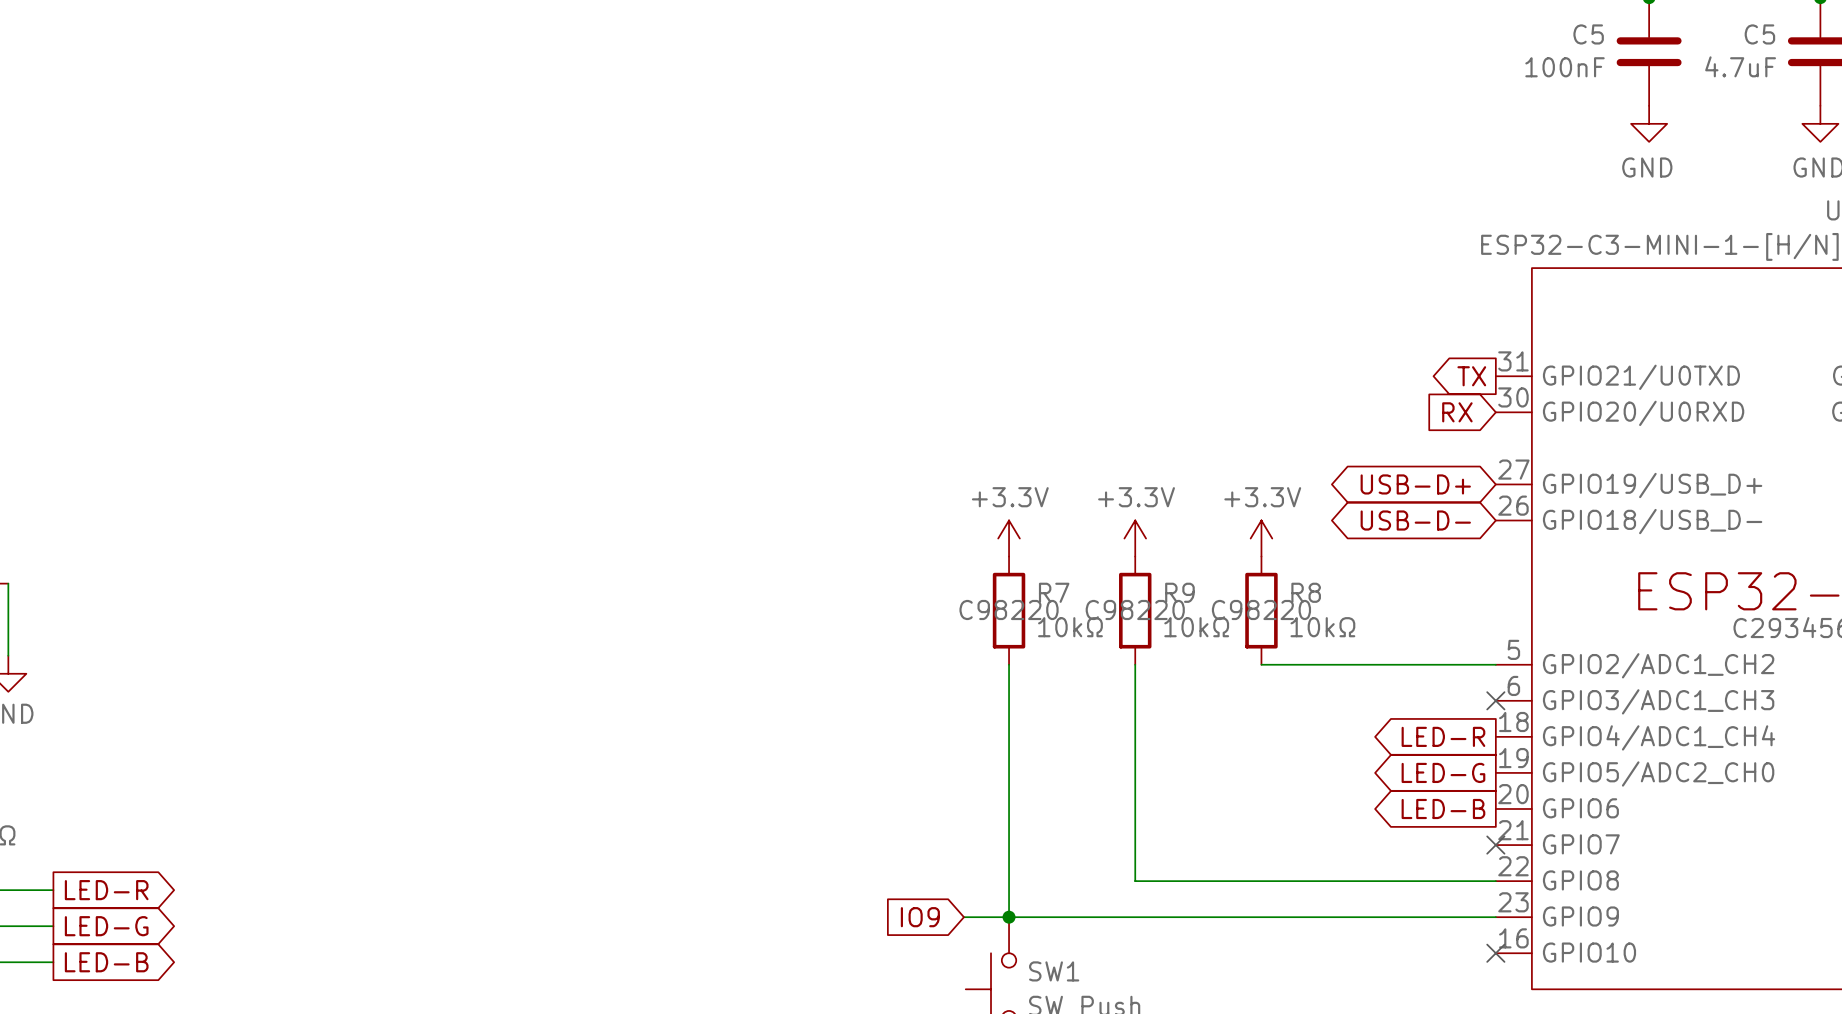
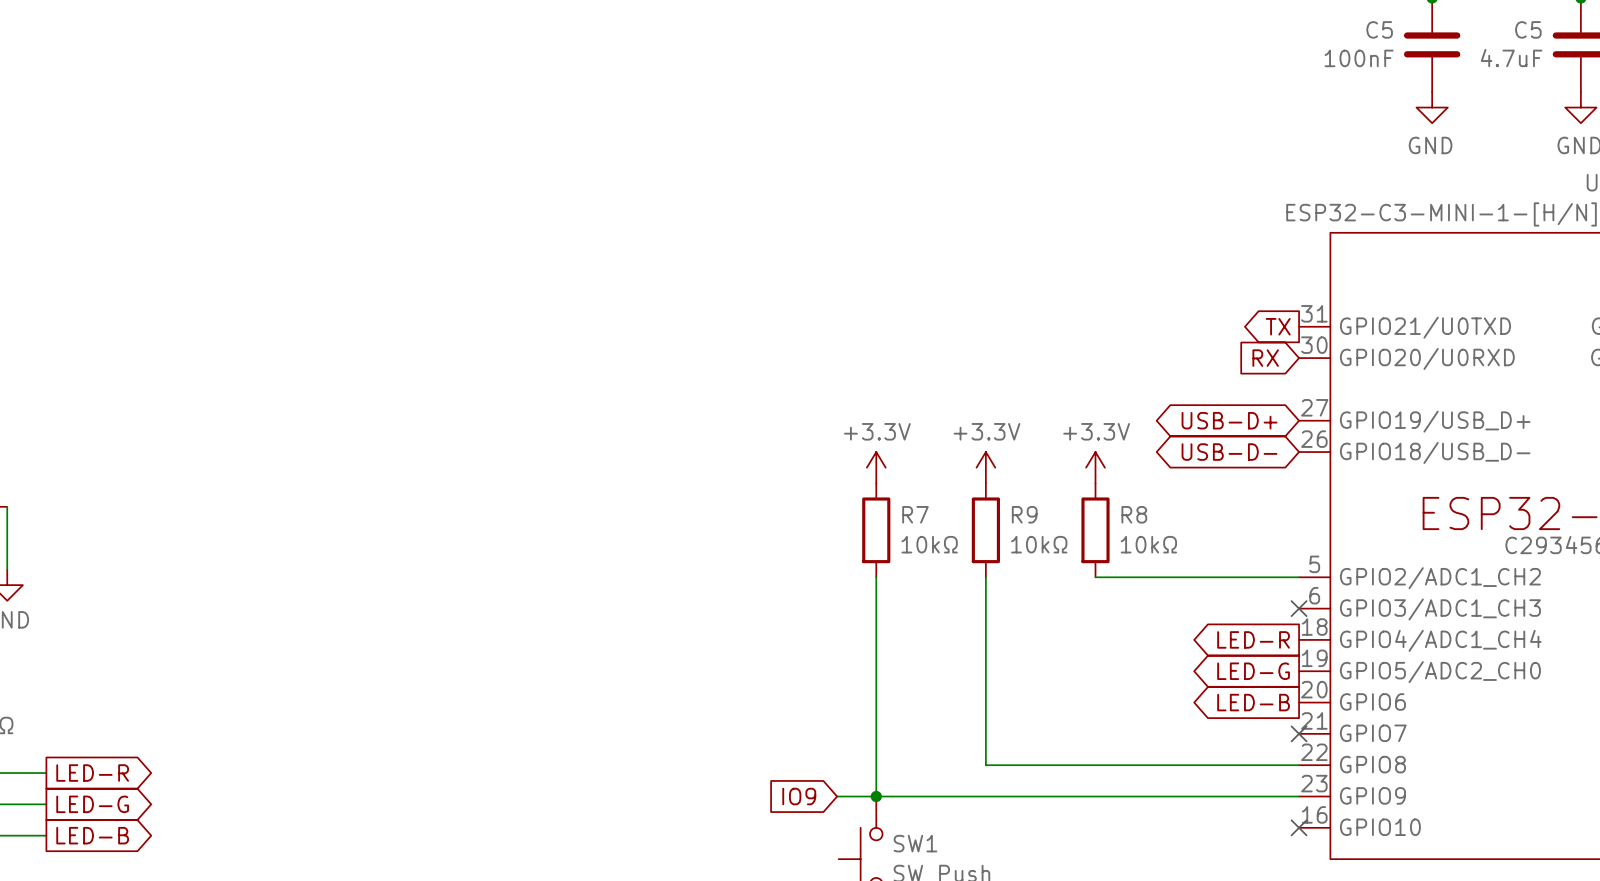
R7 text: C98220 (1009, 609) -> none
R9 text: C98220 (1135, 609) -> none
R8 text: C98220 (1261, 609) -> none

